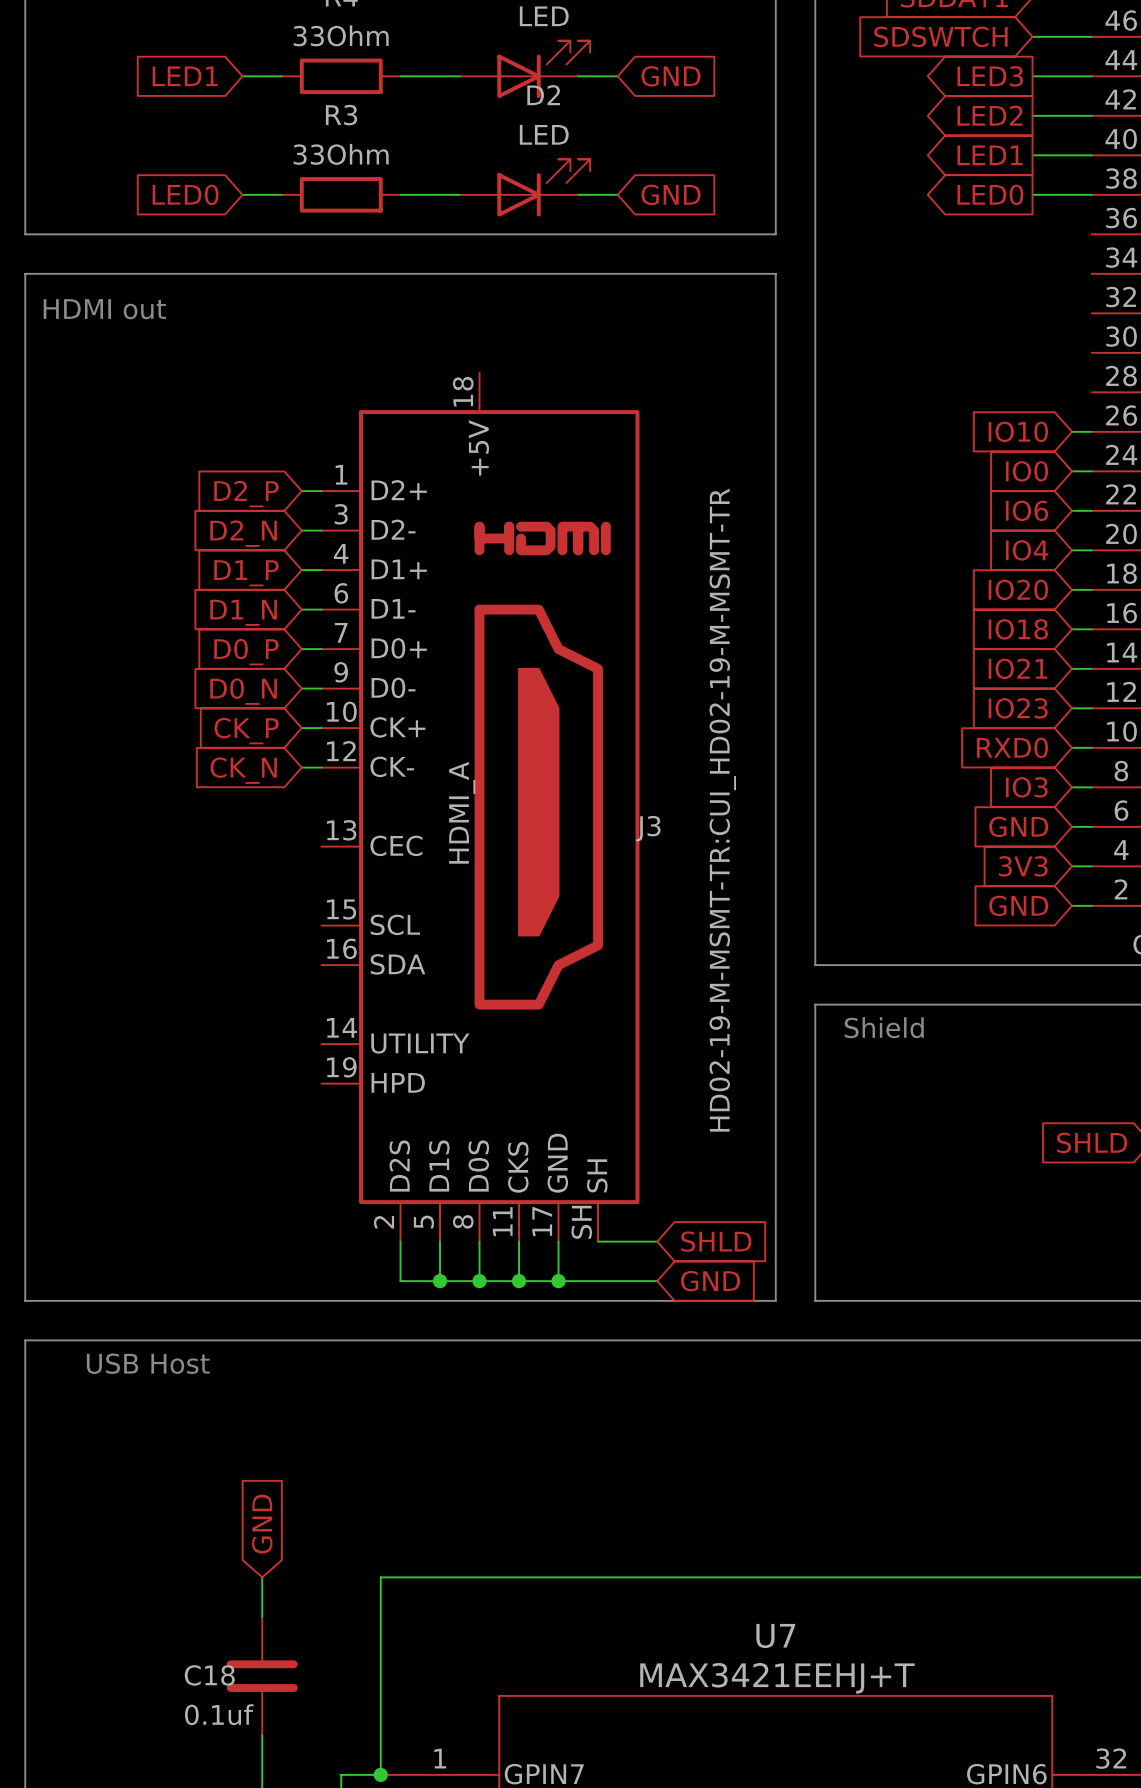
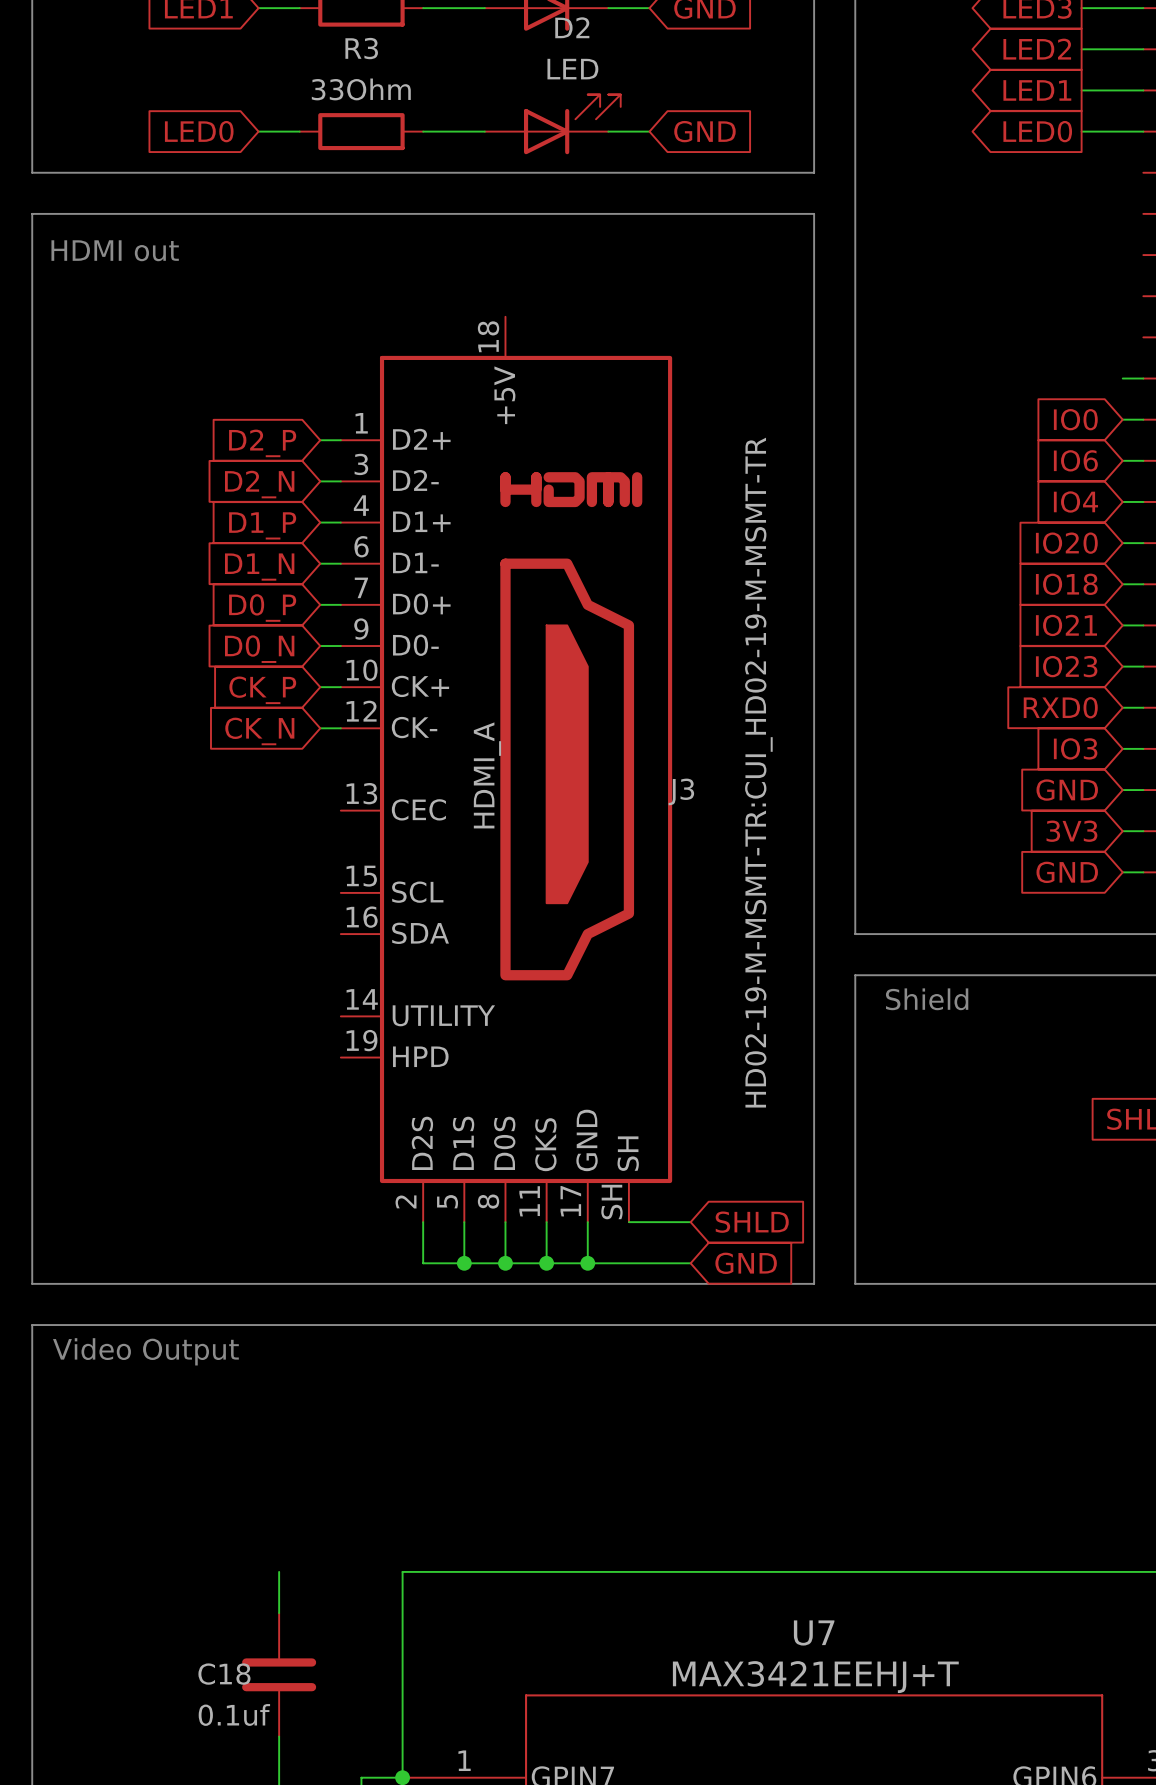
global label: IO10 (1018, 431) -> none
text: USB Host (148, 1363) -> none
text: none -> Video Output (145, 1351)
global label: GND (262, 1524) -> none

